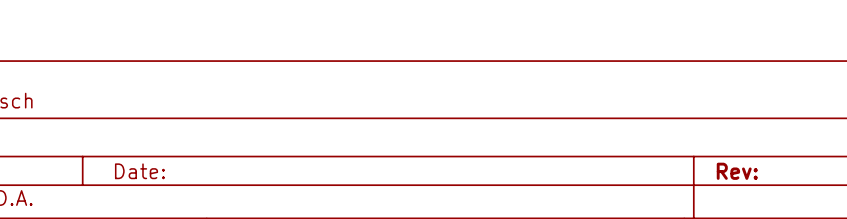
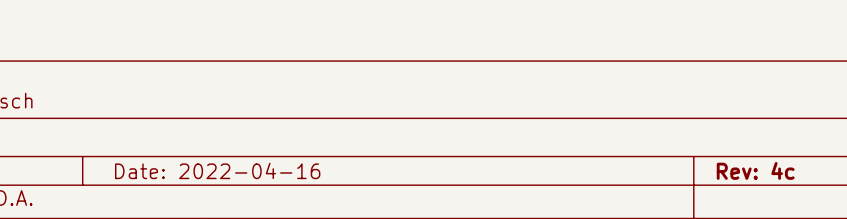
title block: Date: (139, 171) -> Date: 2022-04-16 (217, 170)
title block: Rev: (737, 171) -> Rev: 4c (755, 170)

